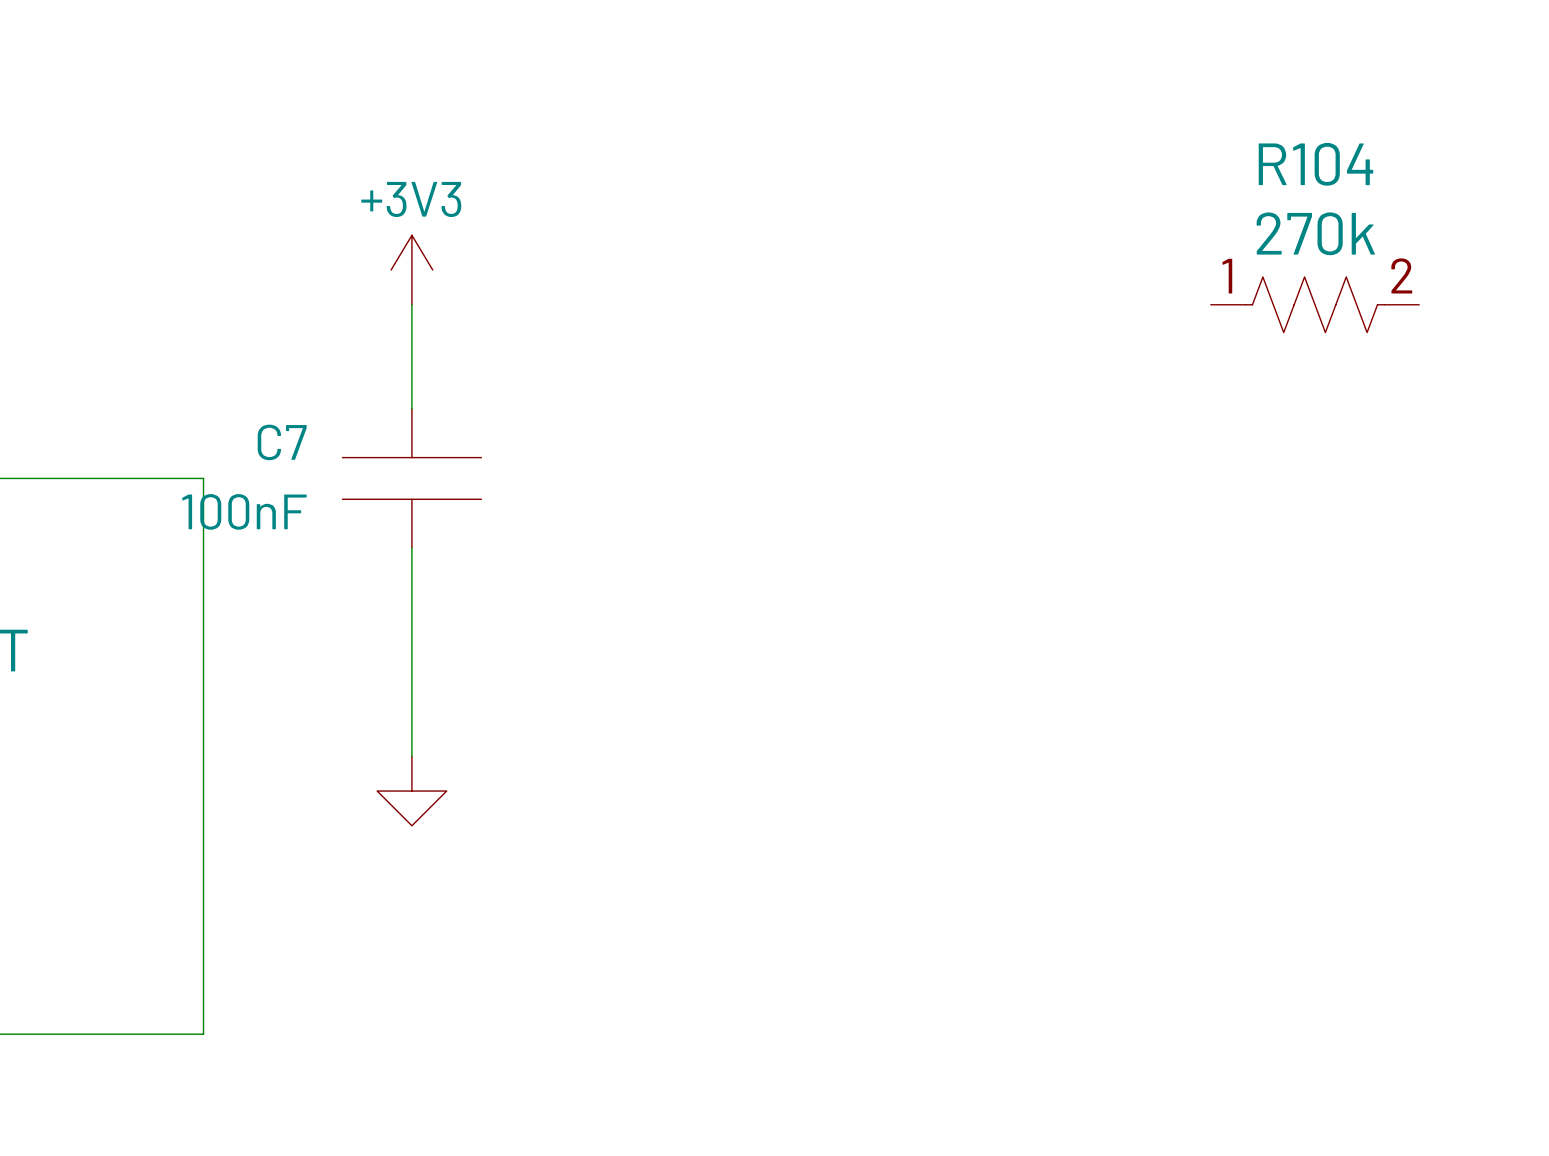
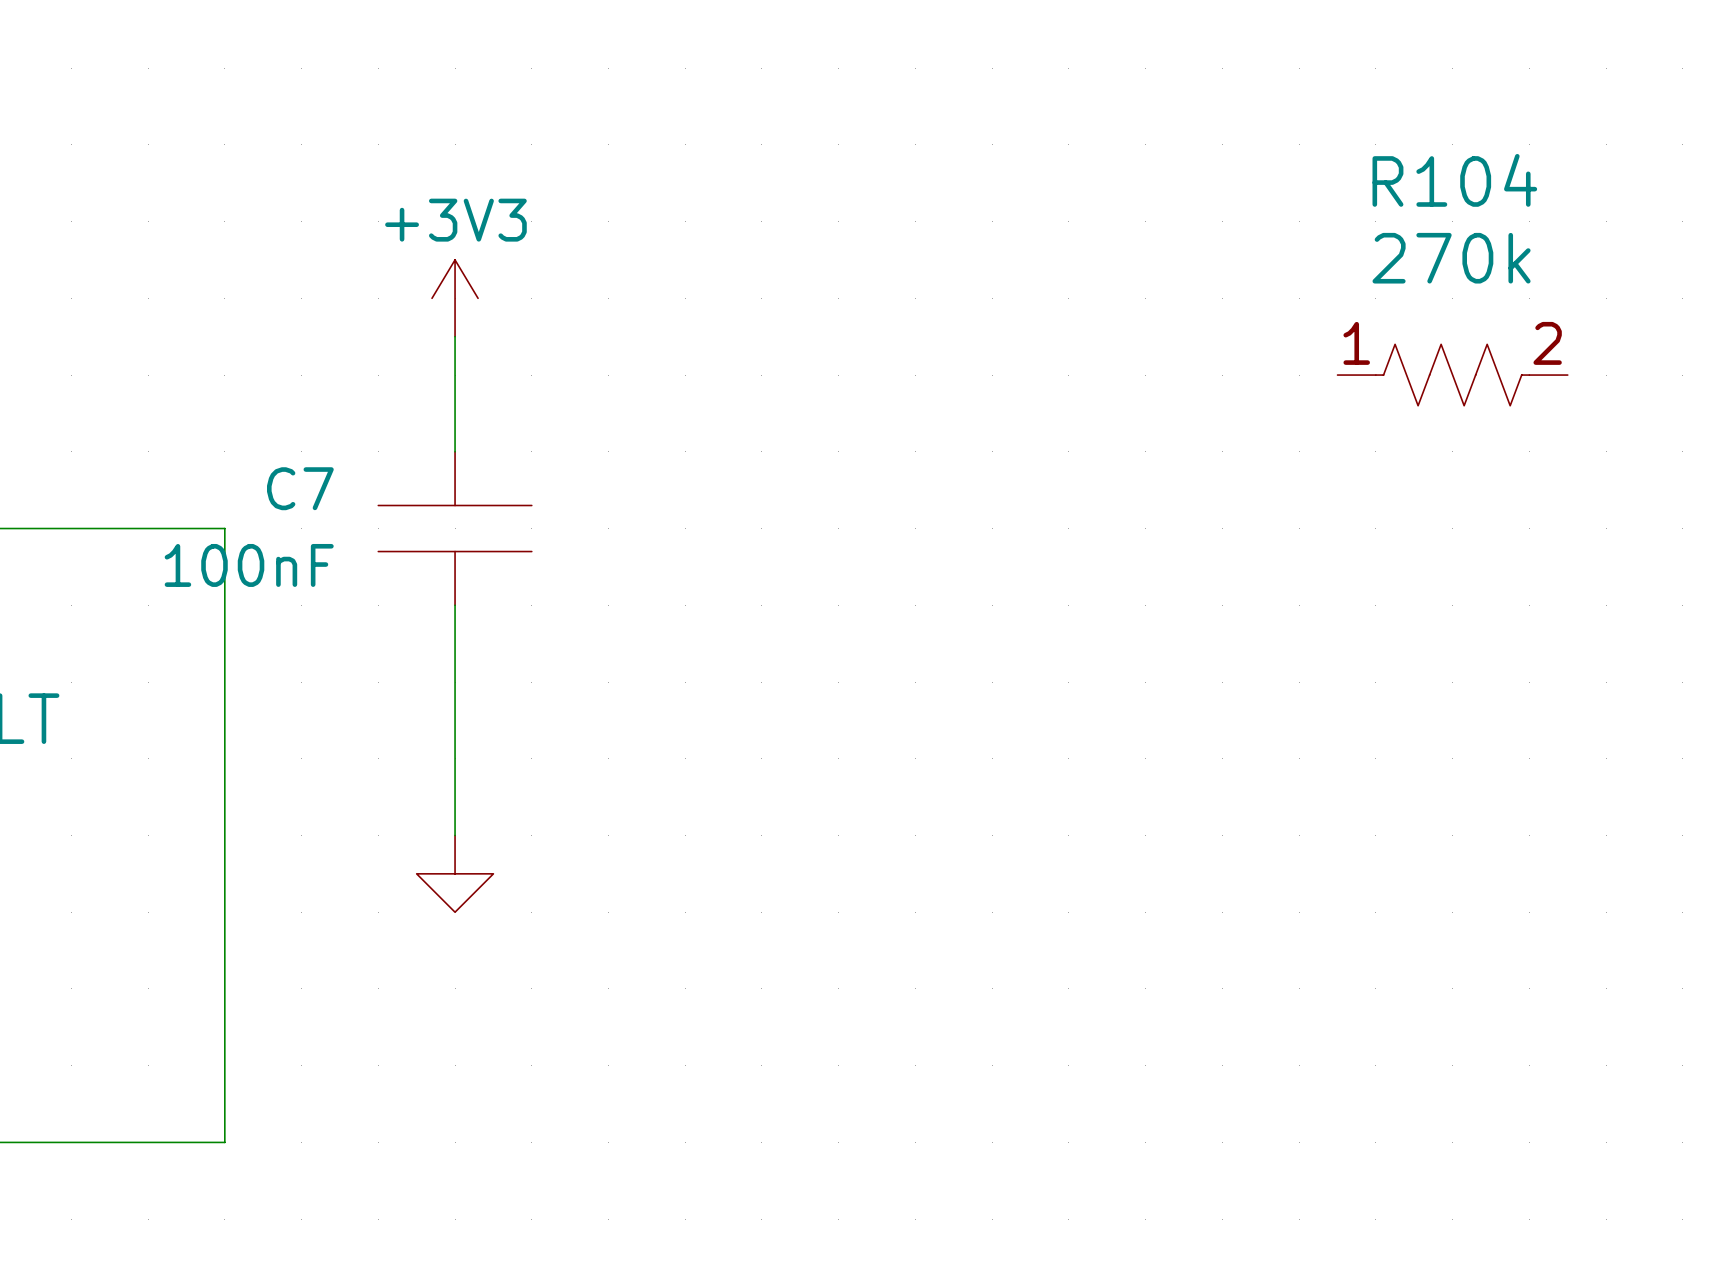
R104 position: (1314, 304) -> (1452, 375)

